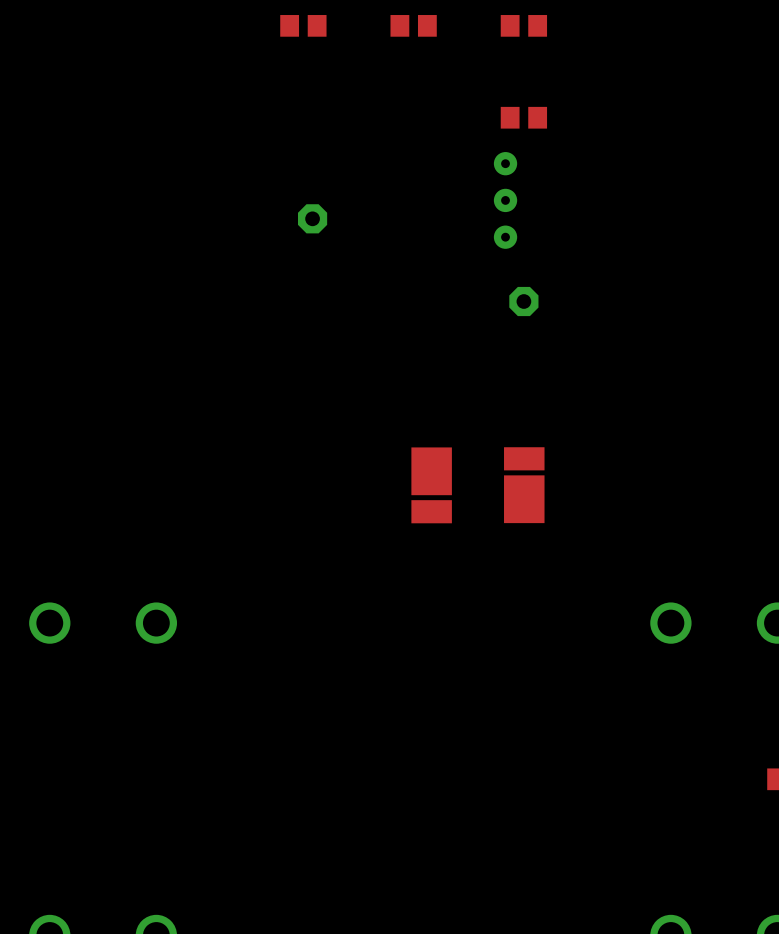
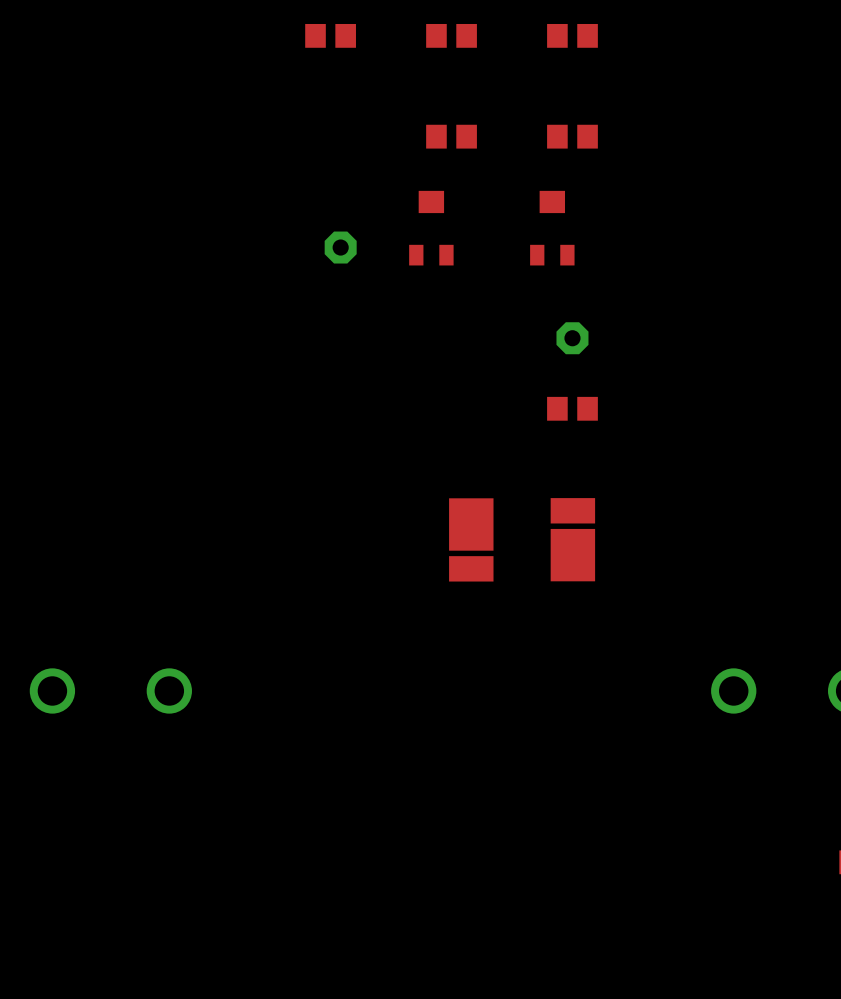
part: none -> (451, 136)
part footprint: [493, 152, 518, 249] -> [530, 190, 575, 266]
part: none -> (431, 228)
part: none -> (572, 408)

